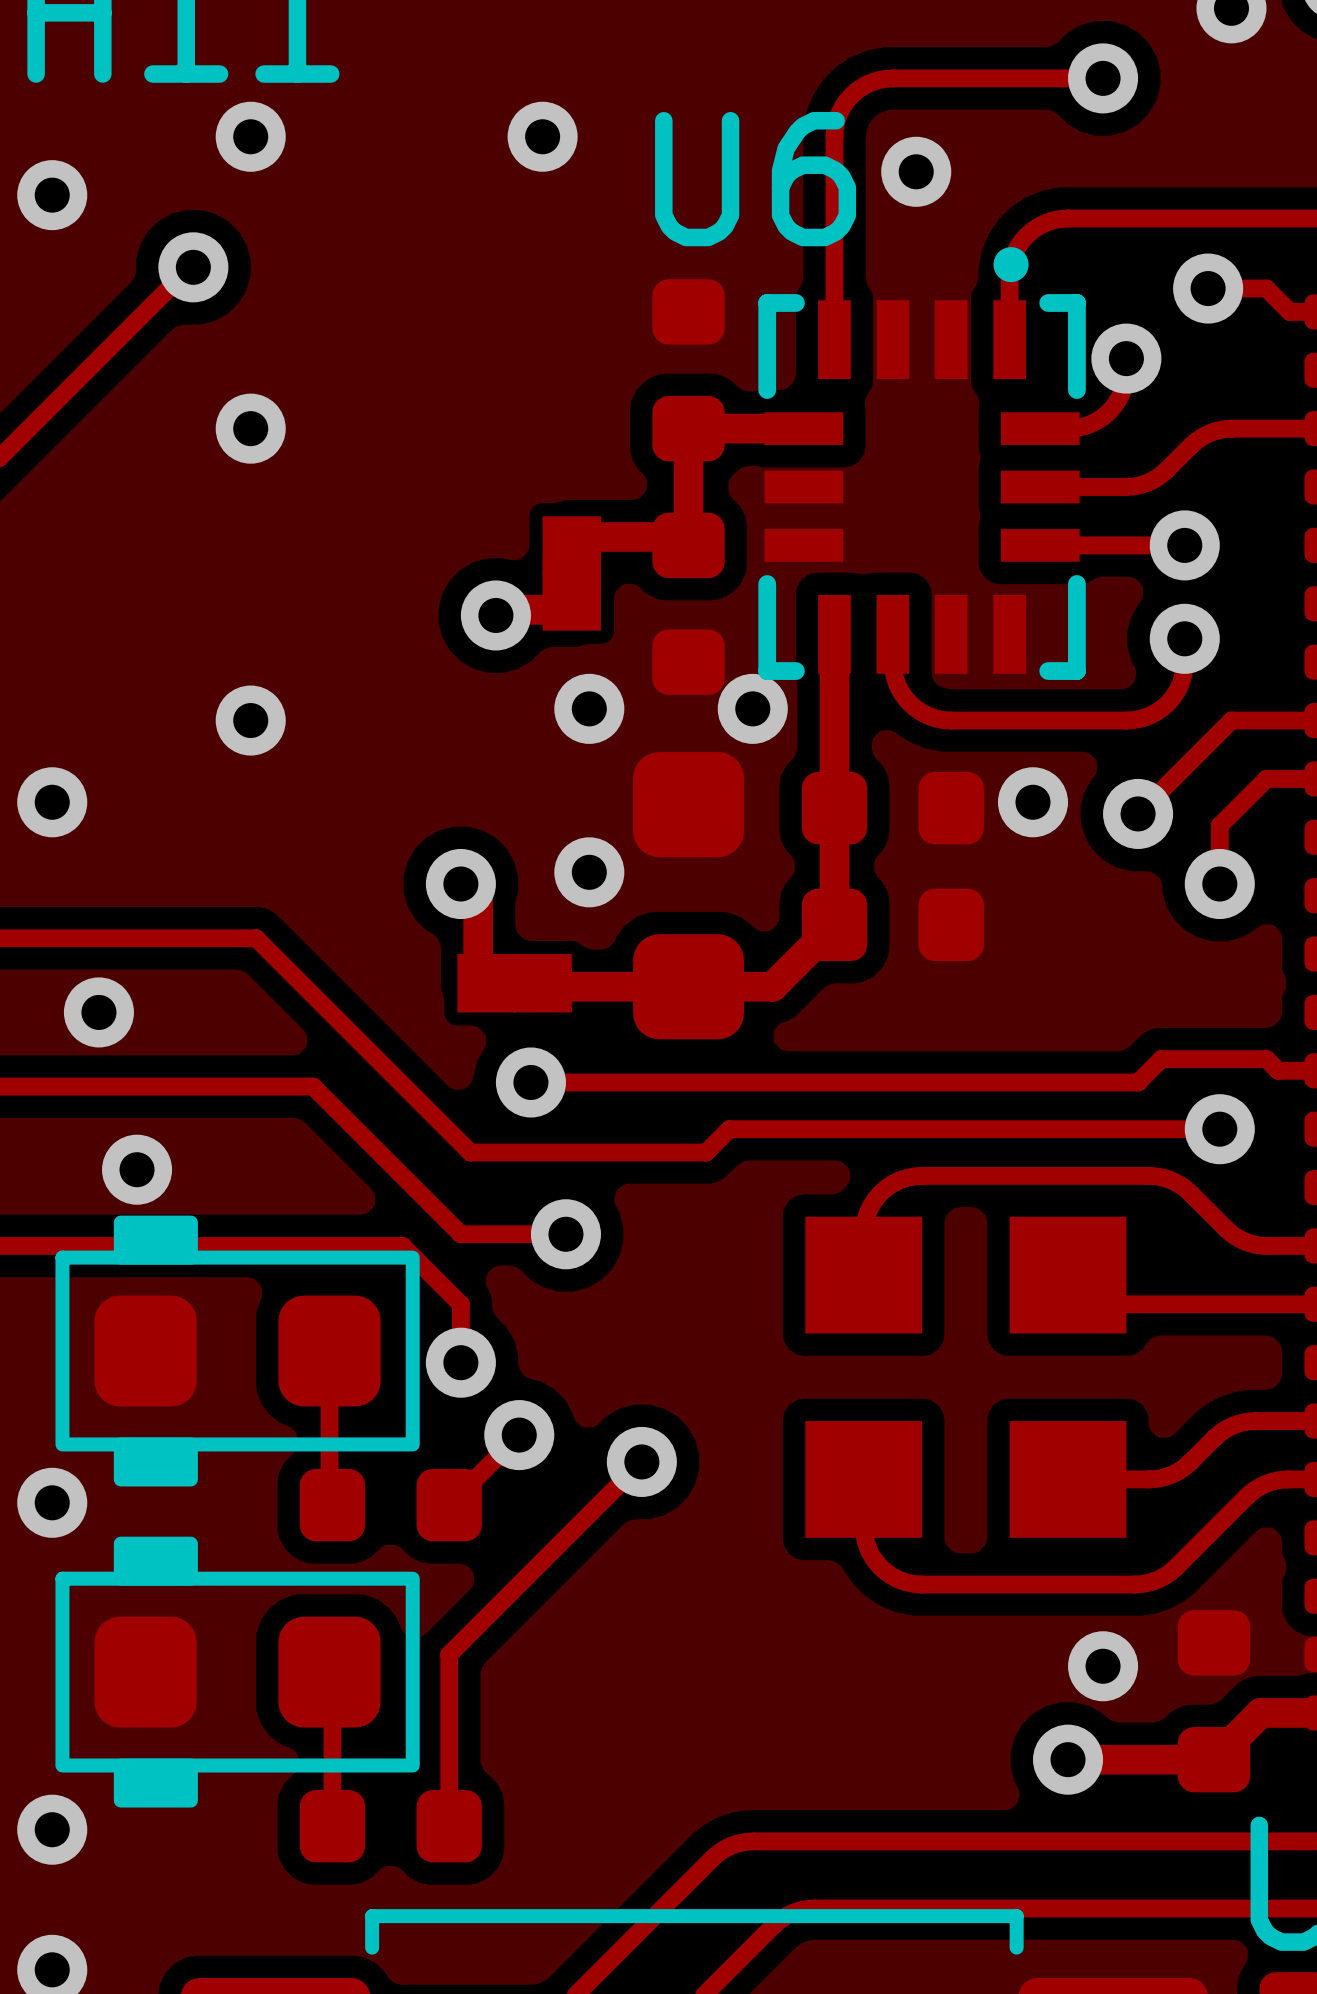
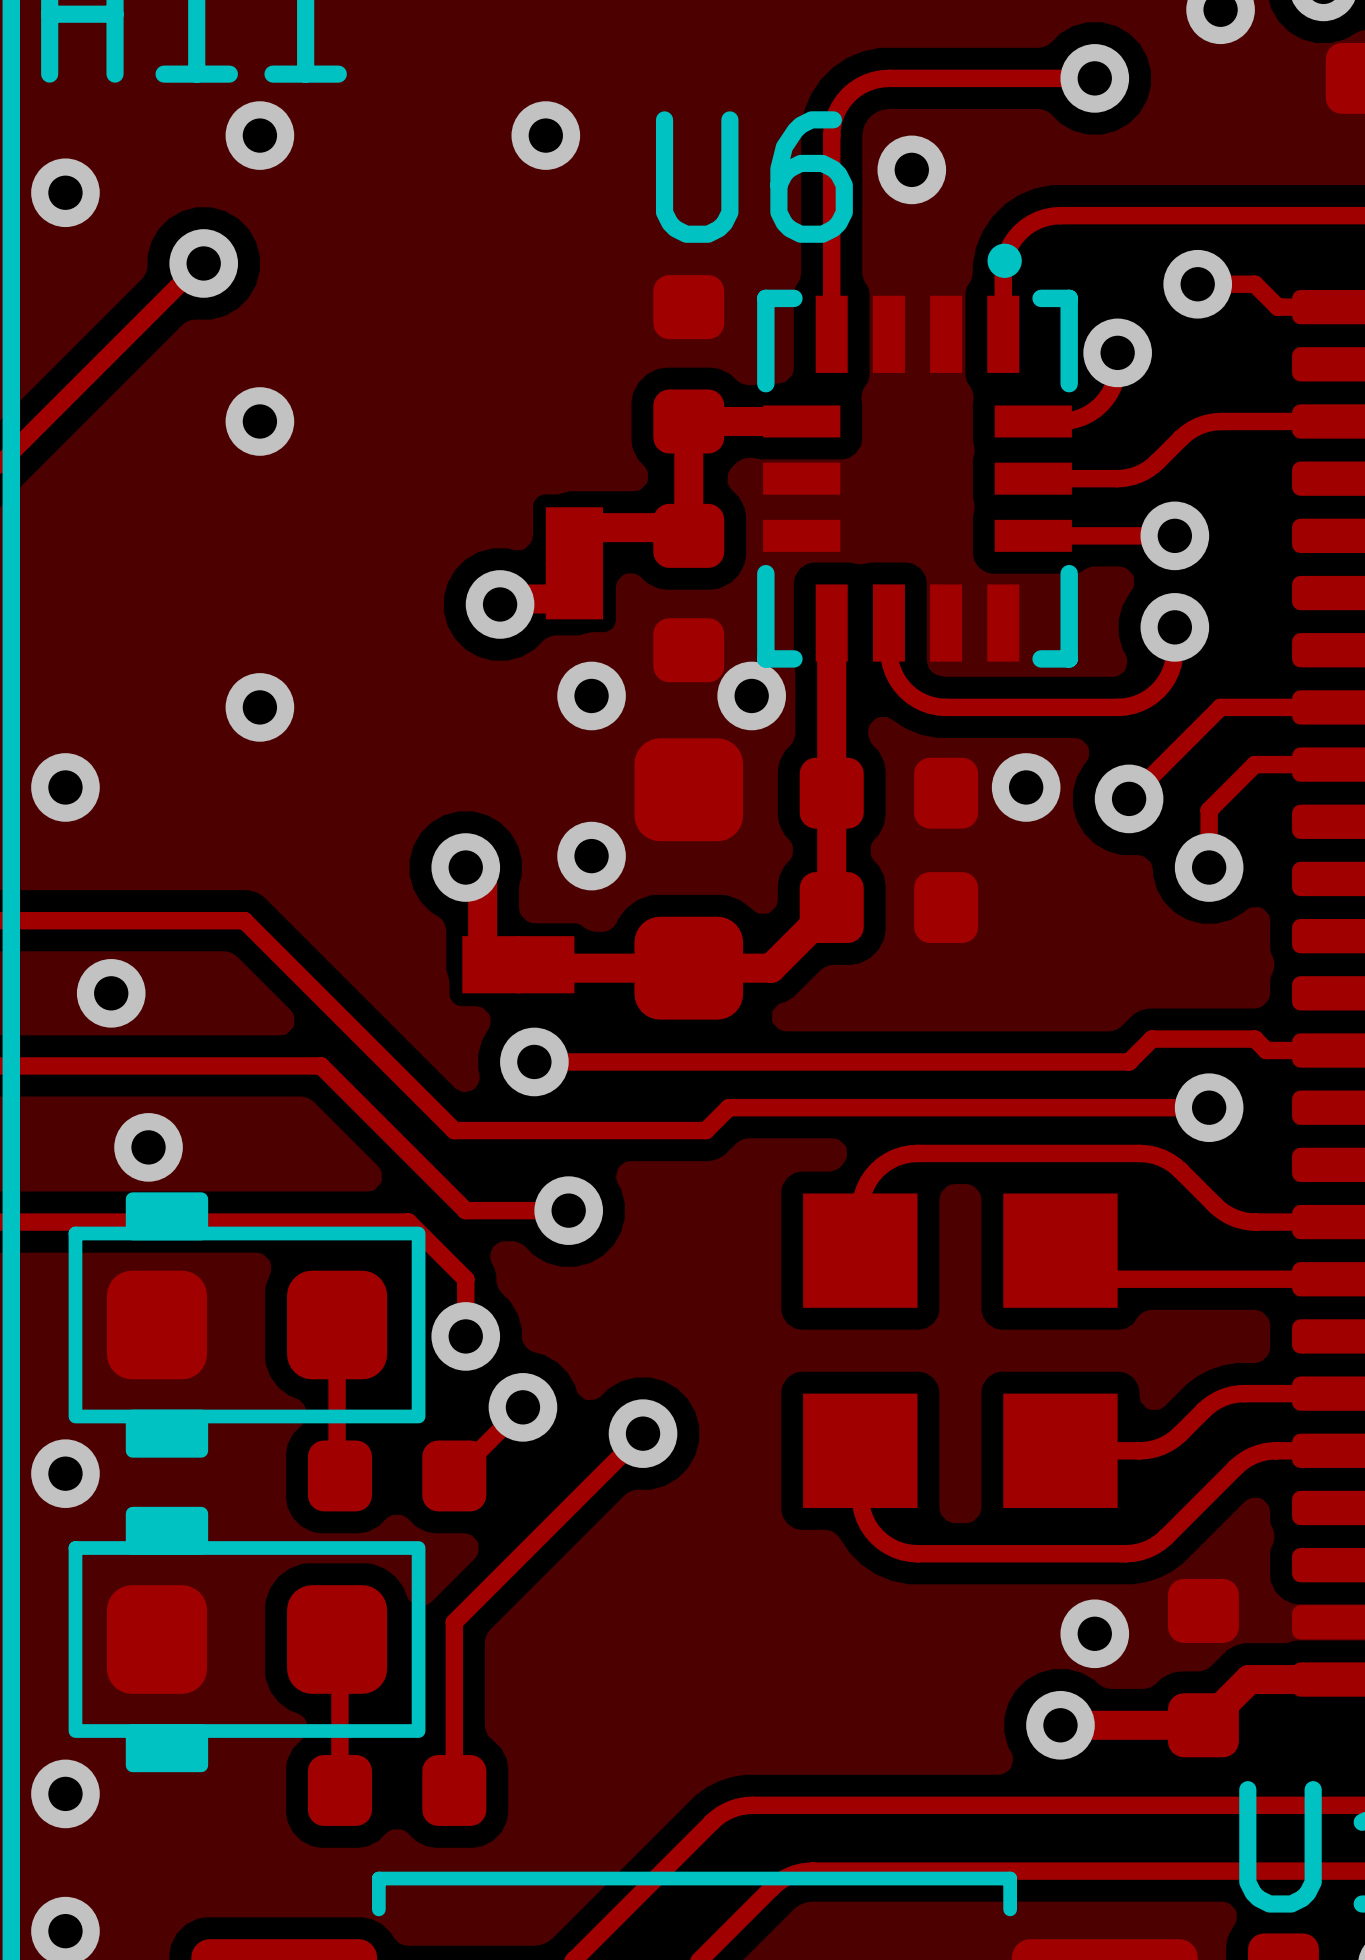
track: (234, 938) (256, 938) (470, 1152) -> (244, 920) (454, 1130) (475, 1130)

